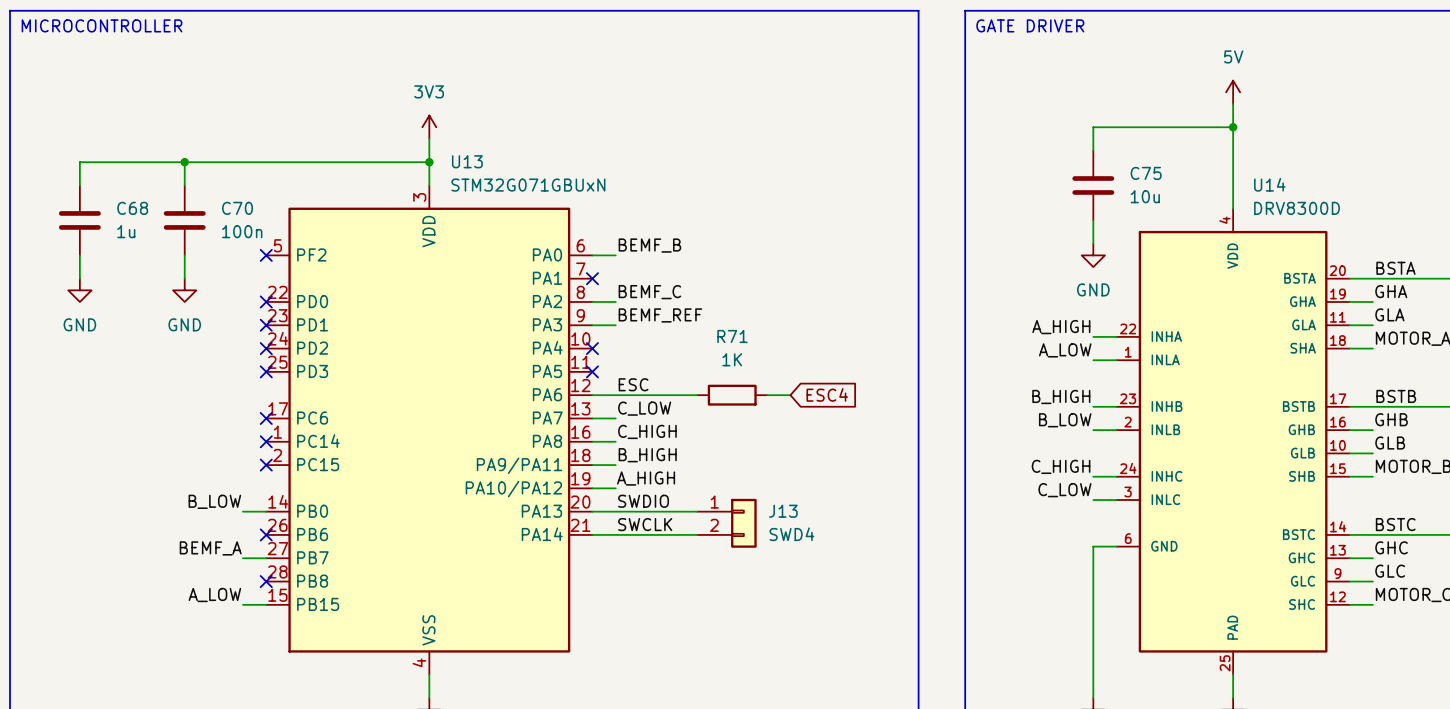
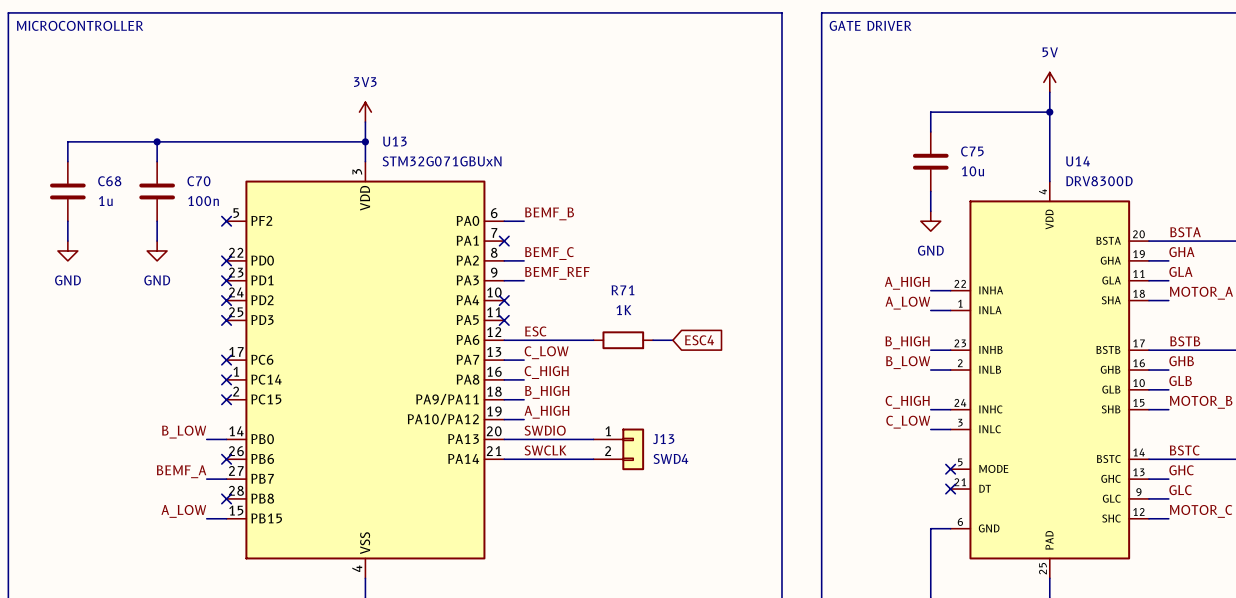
U14 symbol: [1116, 208, 1350, 675] -> [950, 181, 1149, 579]
wire: (1116, 546) (1093, 546) (1093, 616) -> (950, 528) (930, 528)
no-connect mark: none -> (950, 469)
no-connect mark: none -> (950, 489)

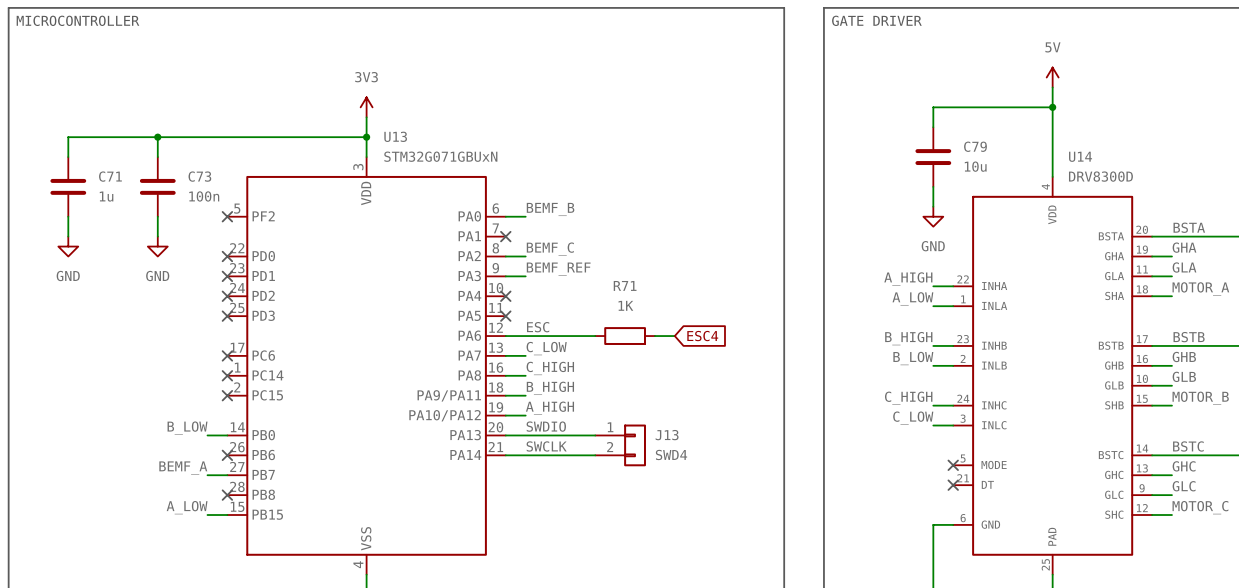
C75 name: C75 (972, 151) -> C79 (975, 146)
C68 name: C68 (109, 181) -> C71 (110, 176)
C70 name: C70 (198, 181) -> C73 (199, 176)

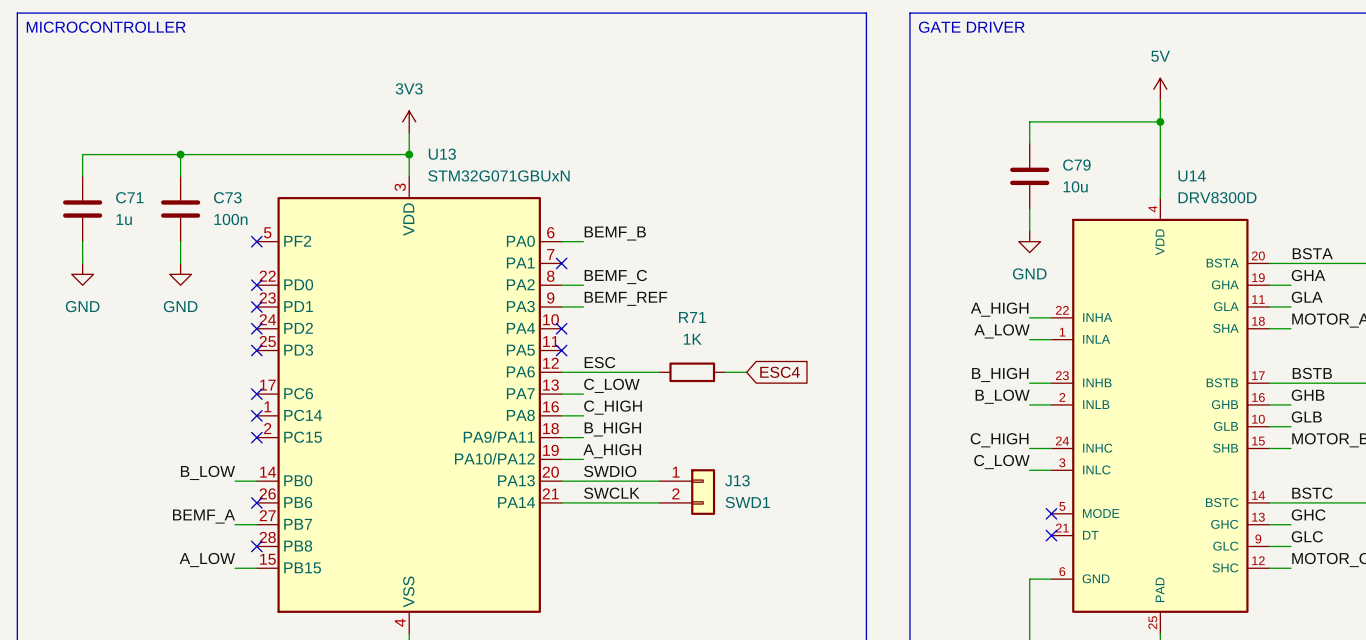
J13 value: SWD4 (671, 454) -> SWD1 (747, 502)

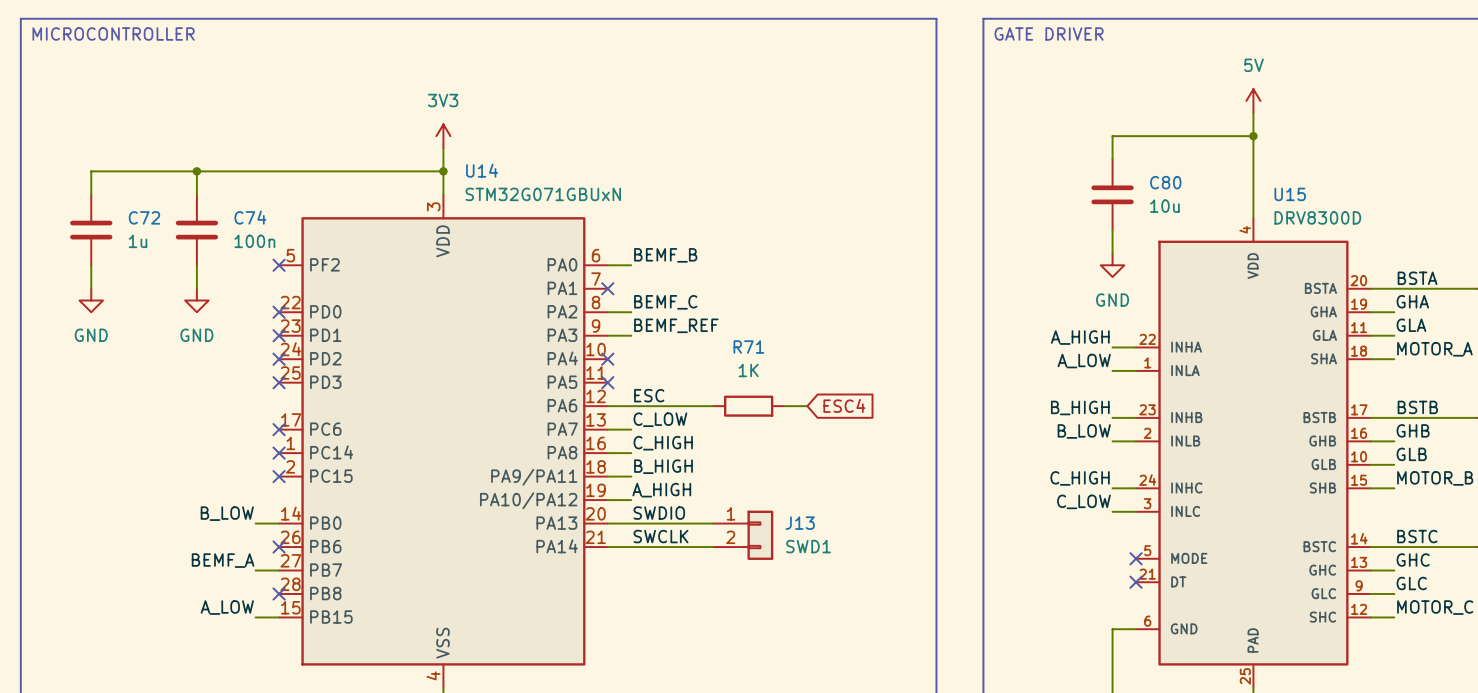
U13 name: U13 (442, 154) -> U14 (482, 170)
C79 name: C79 (1076, 165) -> C80 (1165, 182)
U14 name: U14 (1192, 176) -> U15 (1290, 194)
C71 name: C71 (129, 197) -> C72 (144, 217)
C73 name: C73 (227, 197) -> C74 (250, 217)

